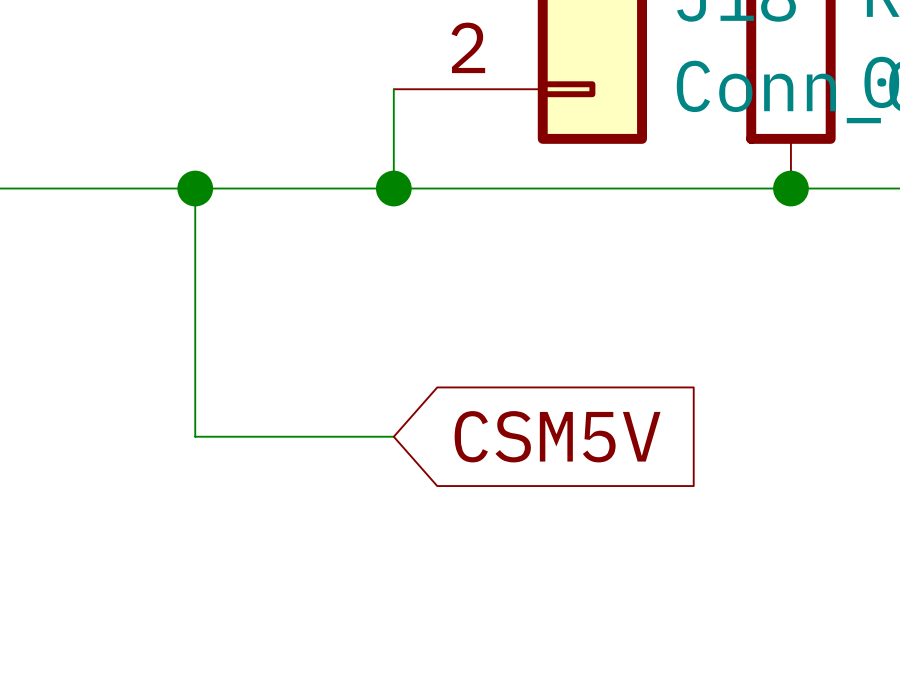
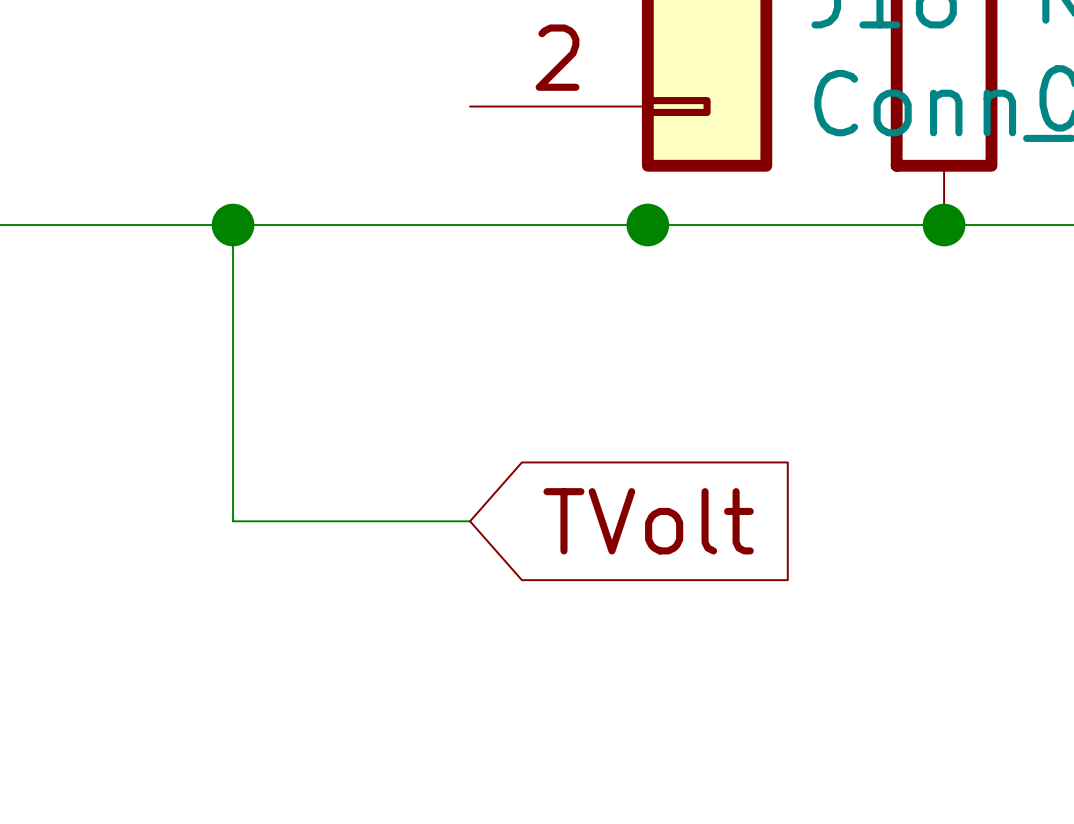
wire: (393, 89) (393, 188) -> none
junction position: (393, 188) -> (647, 225)
global label: CSM5V (557, 436) -> TVolt (648, 521)

